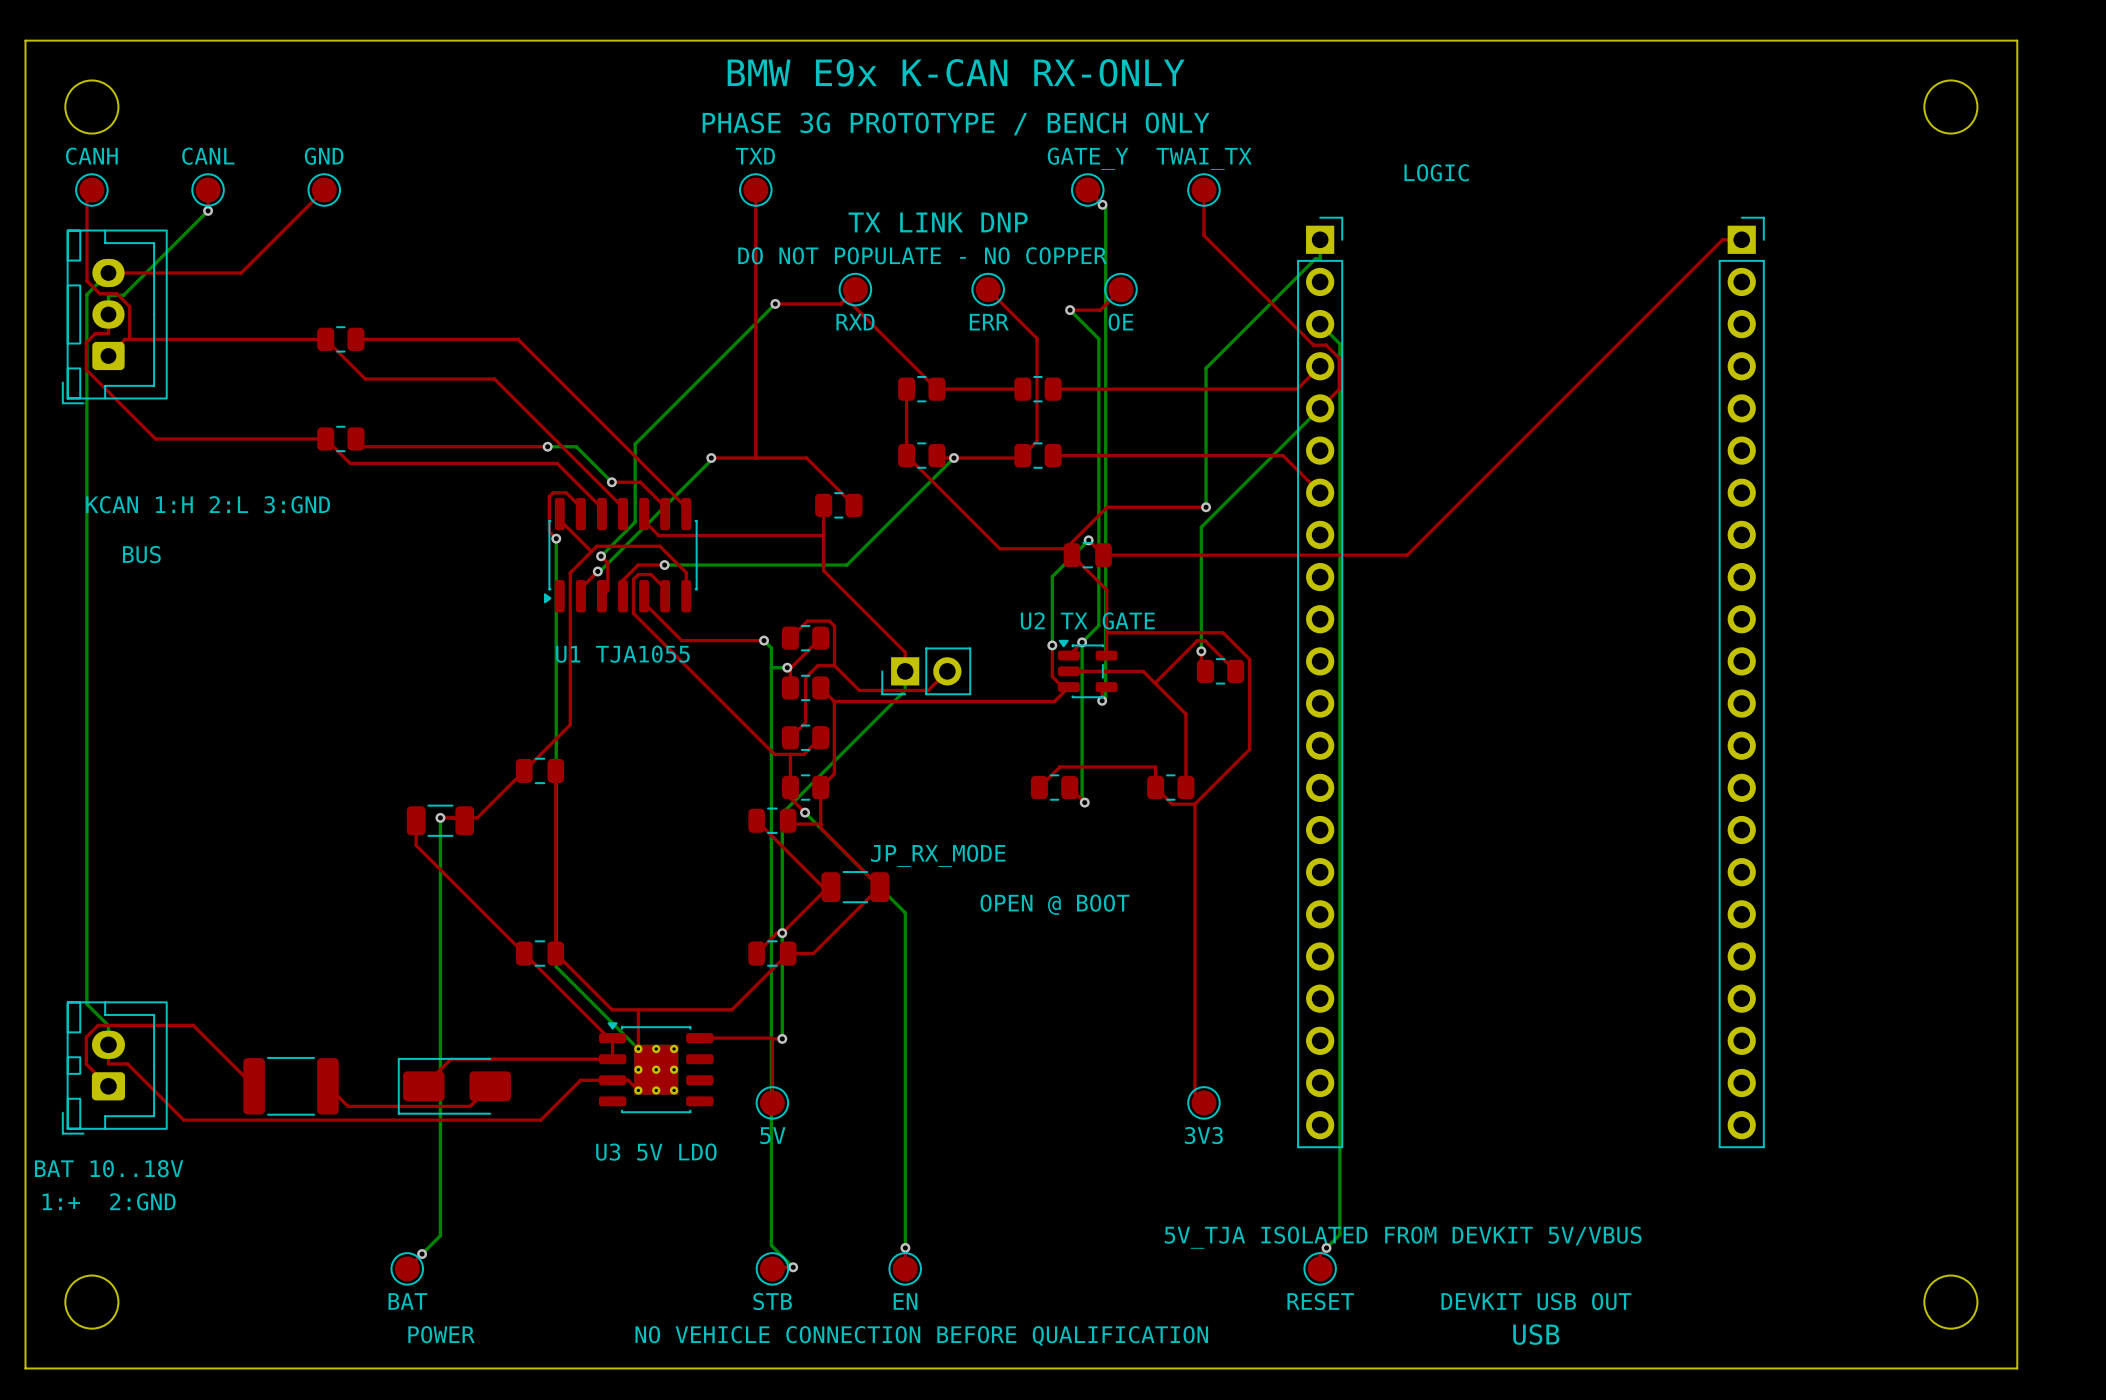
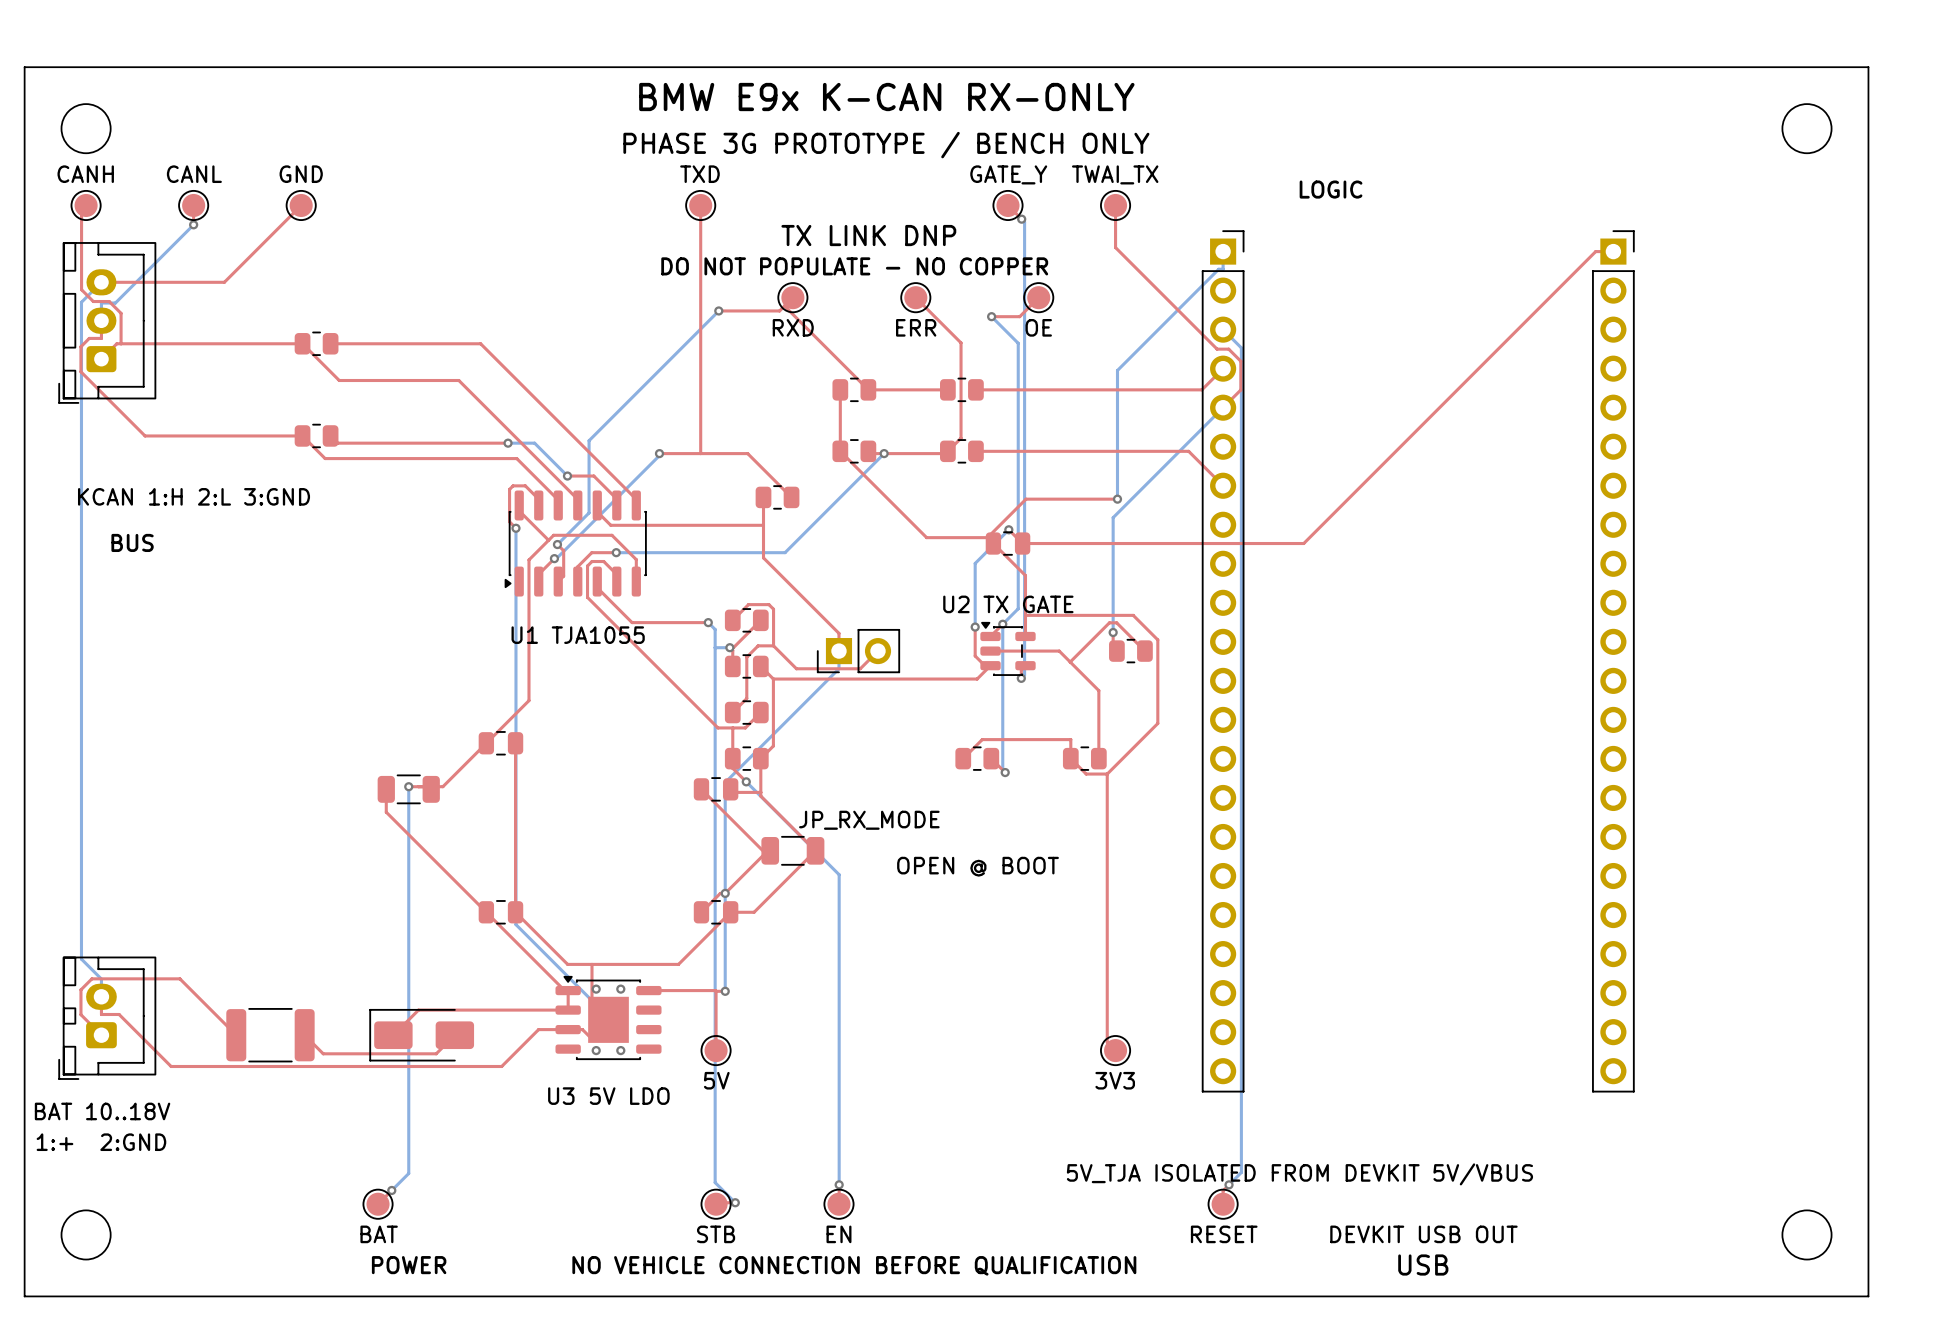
part footprint: [598, 1022, 714, 1114] -> [555, 975, 662, 1061]
via: none -> (596, 989)
via: none -> (620, 989)
via: none -> (596, 1050)
via: none -> (620, 1050)

